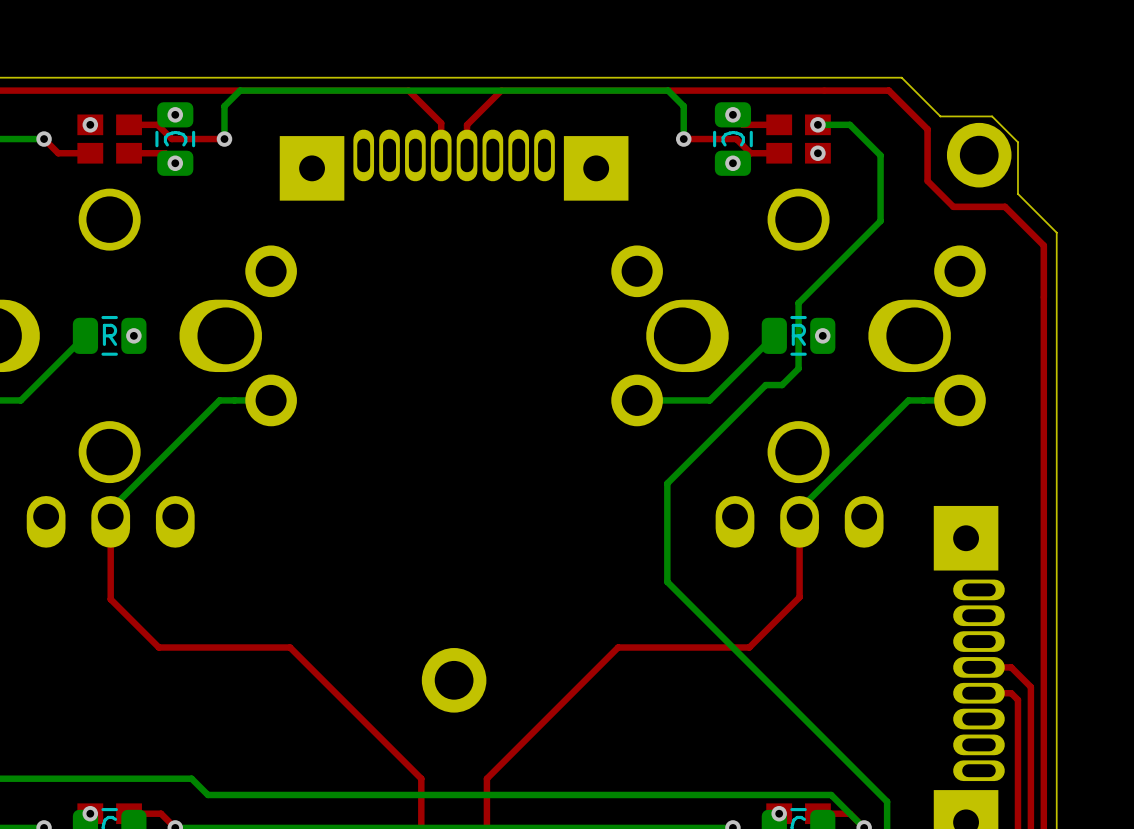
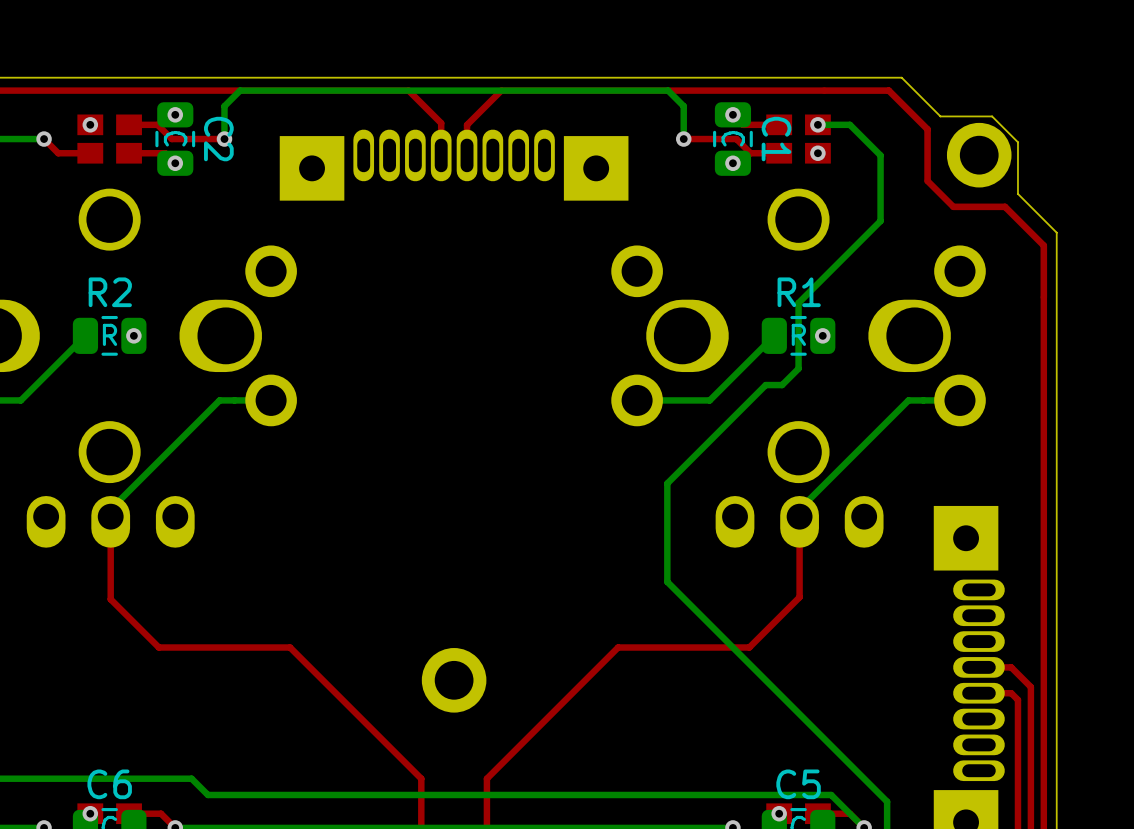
C2 name: none -> C2 (218, 139)
C1 name: none -> C1 (776, 139)
R2 name: none -> R2 (110, 292)
R1 name: none -> R1 (799, 292)
C6 name: none -> C6 (109, 784)
C5 name: none -> C5 (798, 784)

